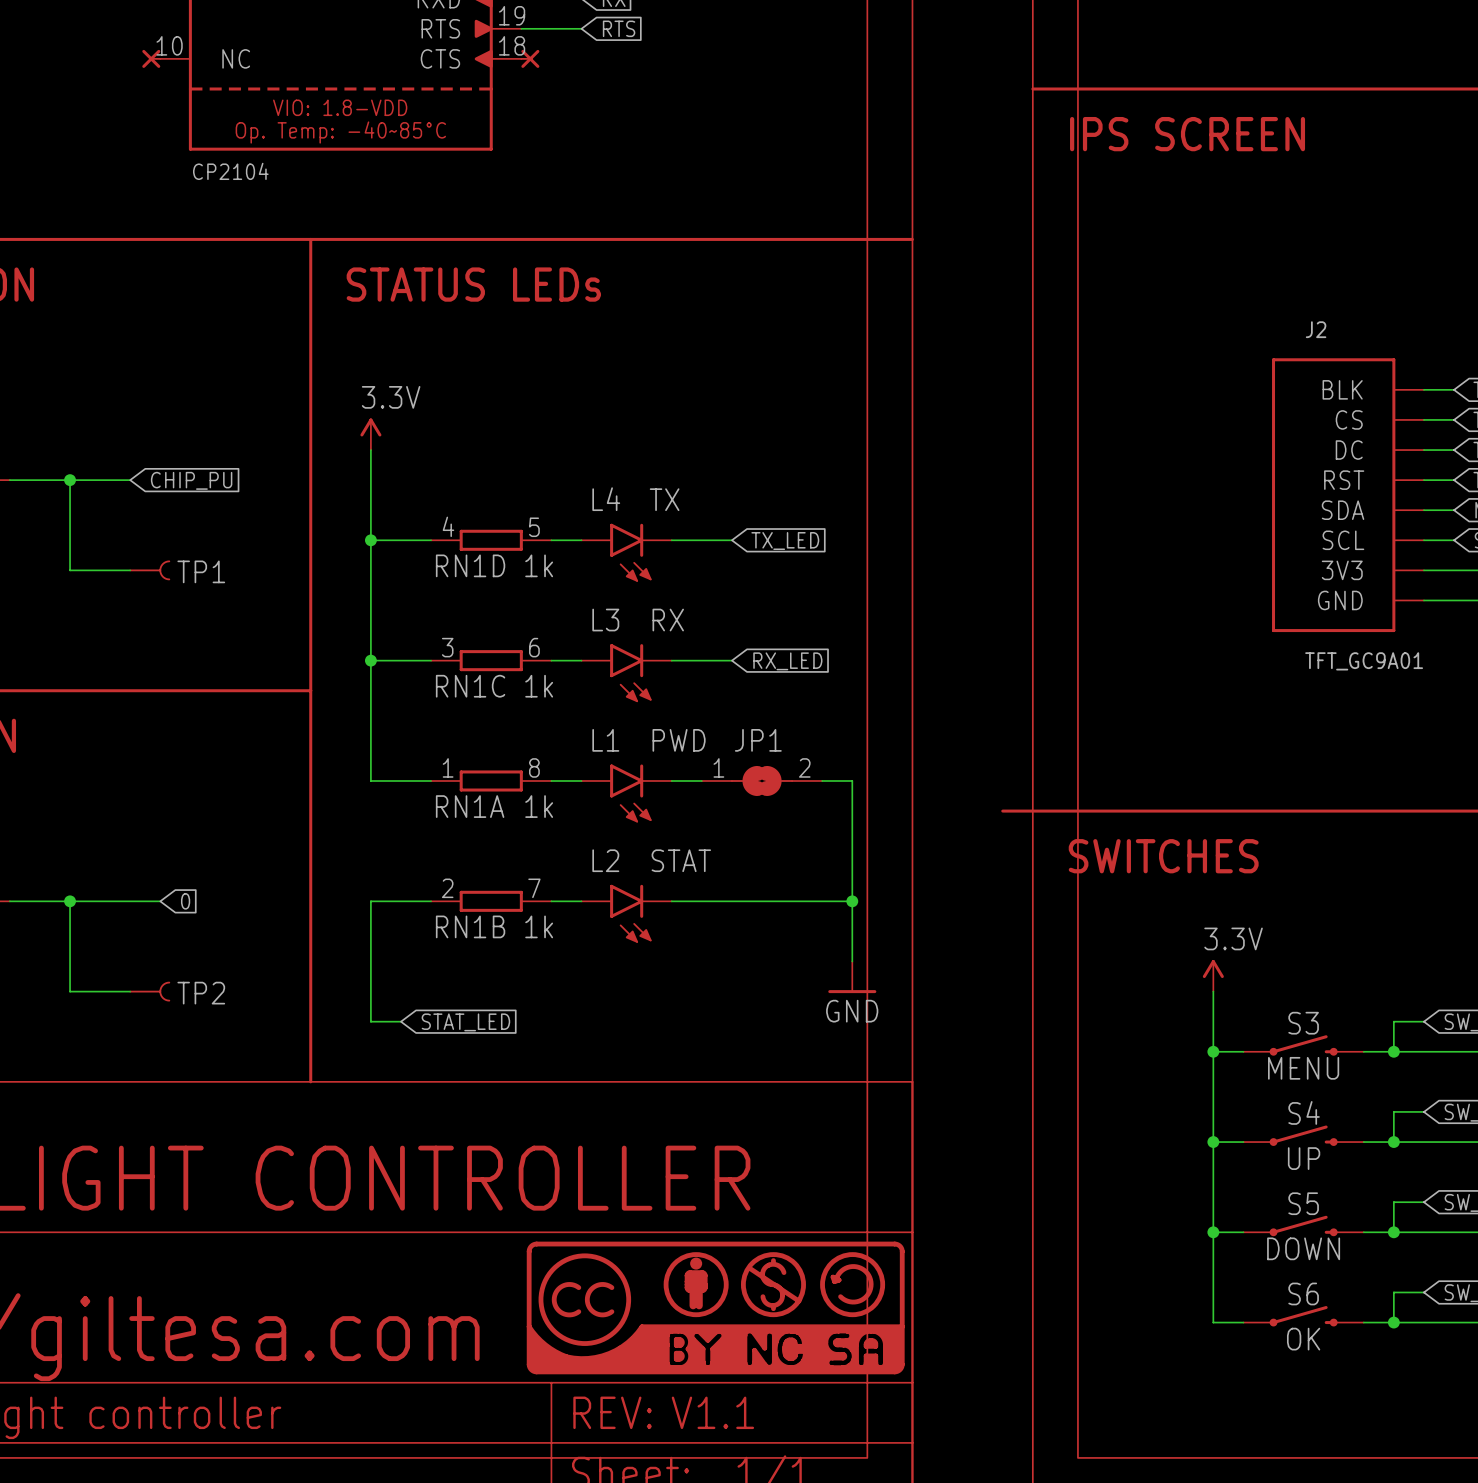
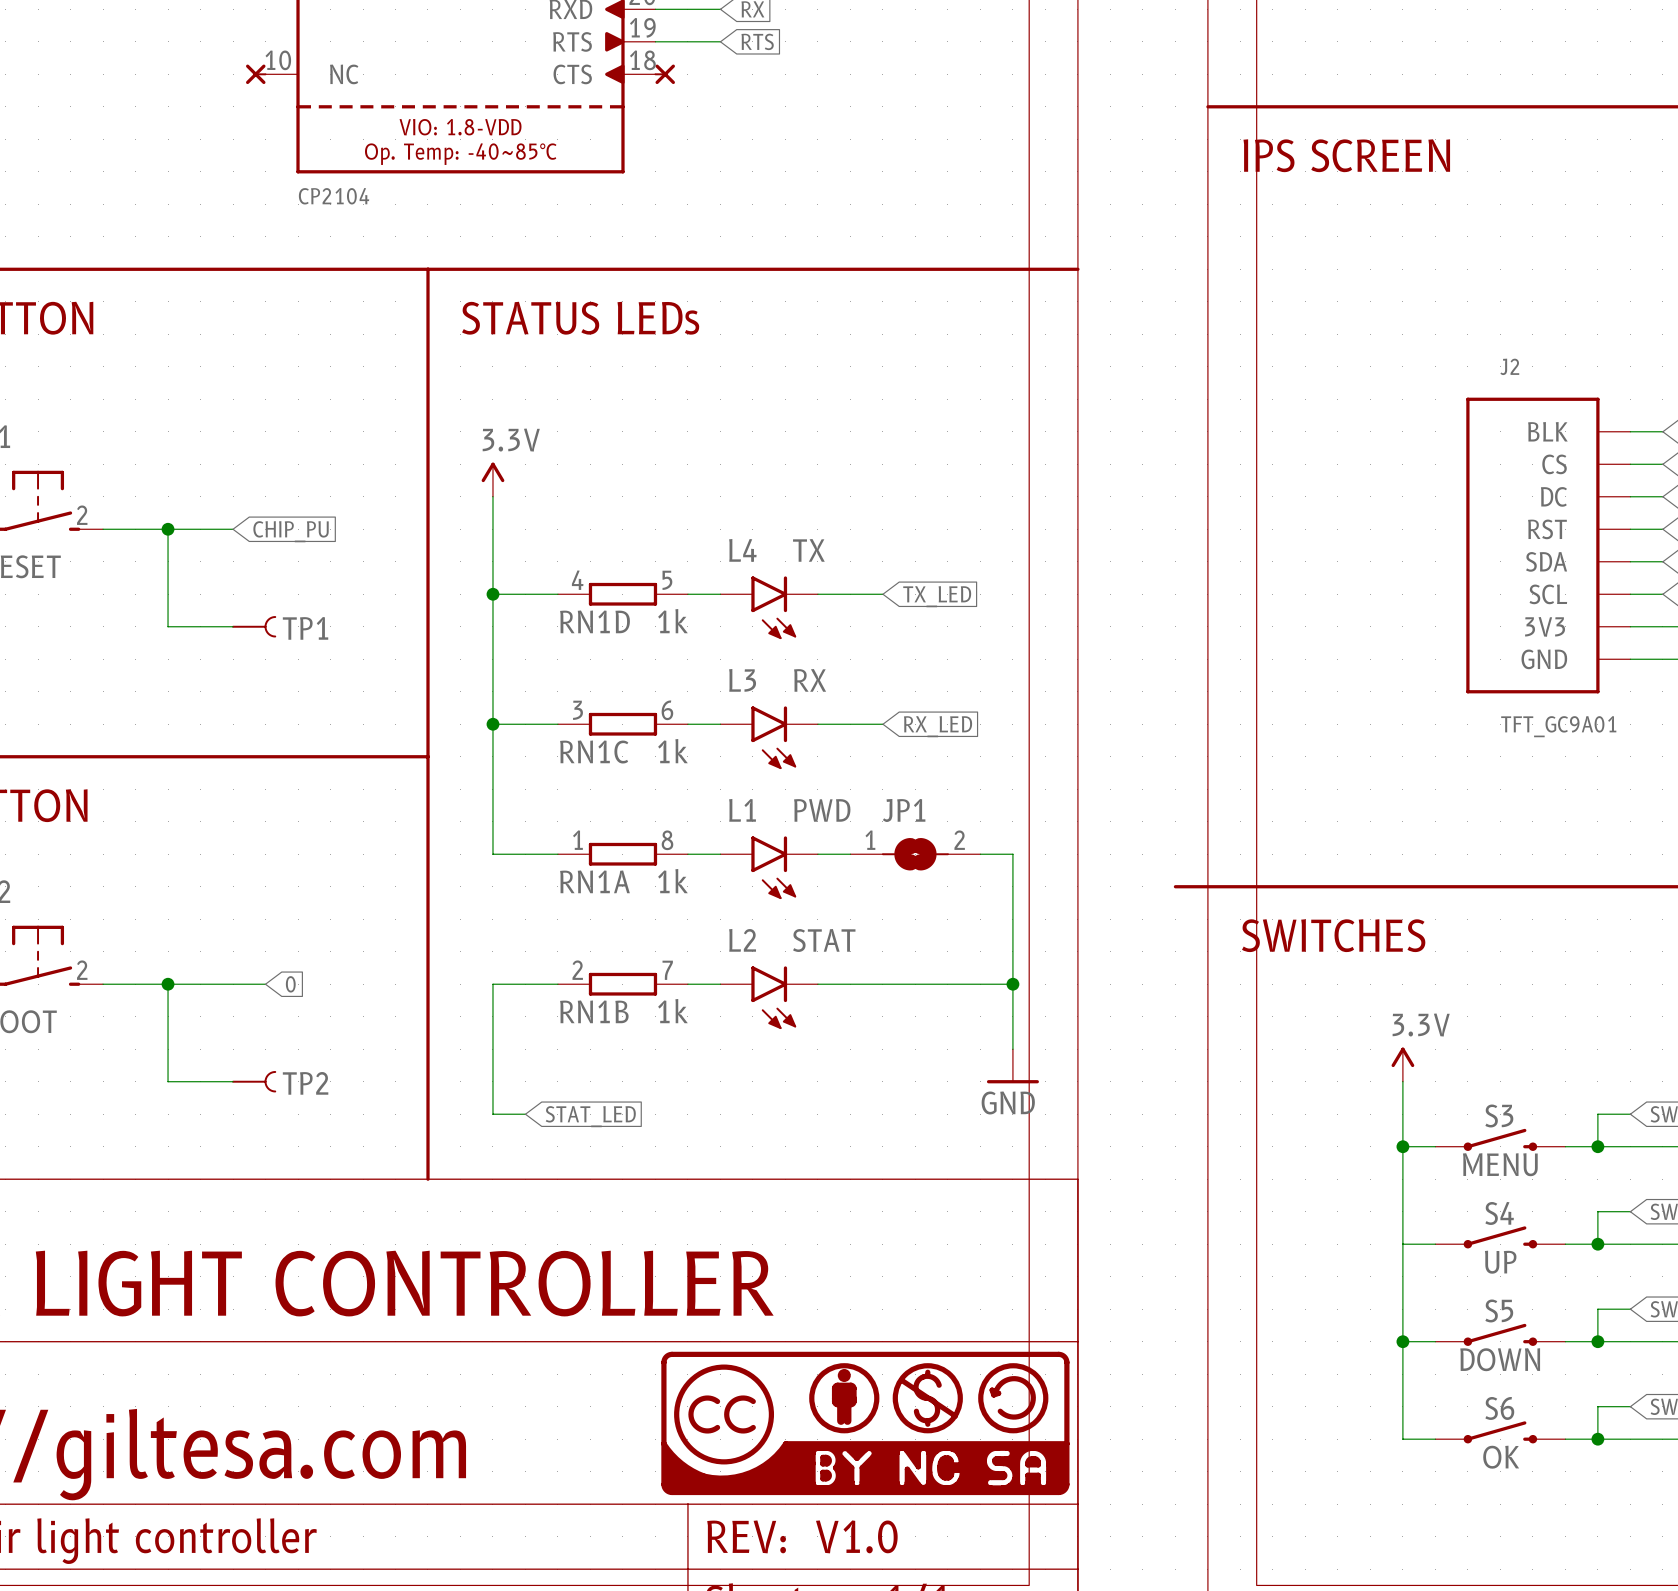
junction: (1213, 1142) -> none
text: V1.1 (712, 1412) -> V1.0 (856, 1536)

